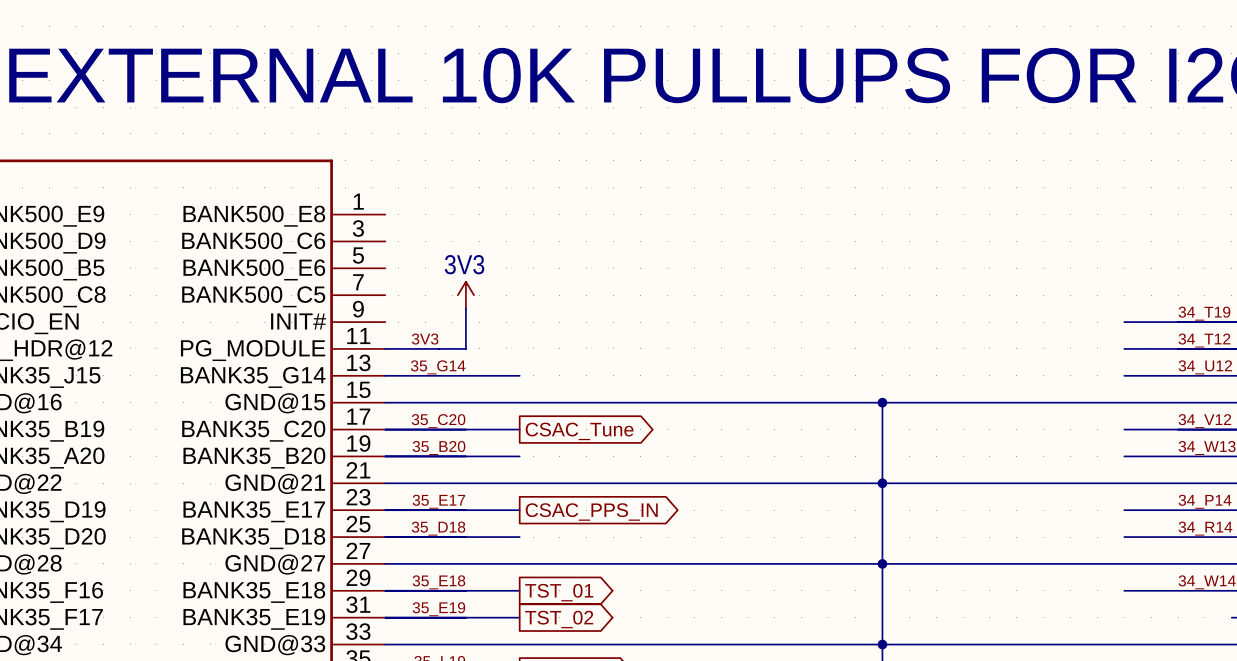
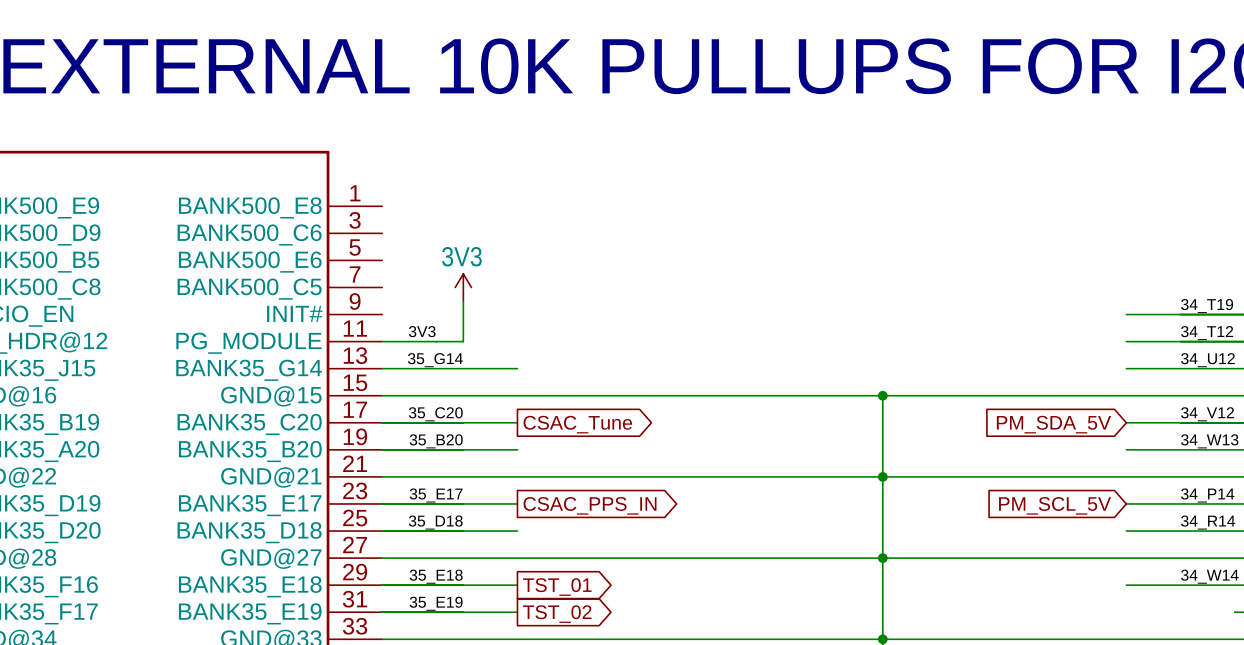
global label: none -> PM_SDA_5V (1053, 424)
global label: none -> PM_SCL_5V (1055, 505)

